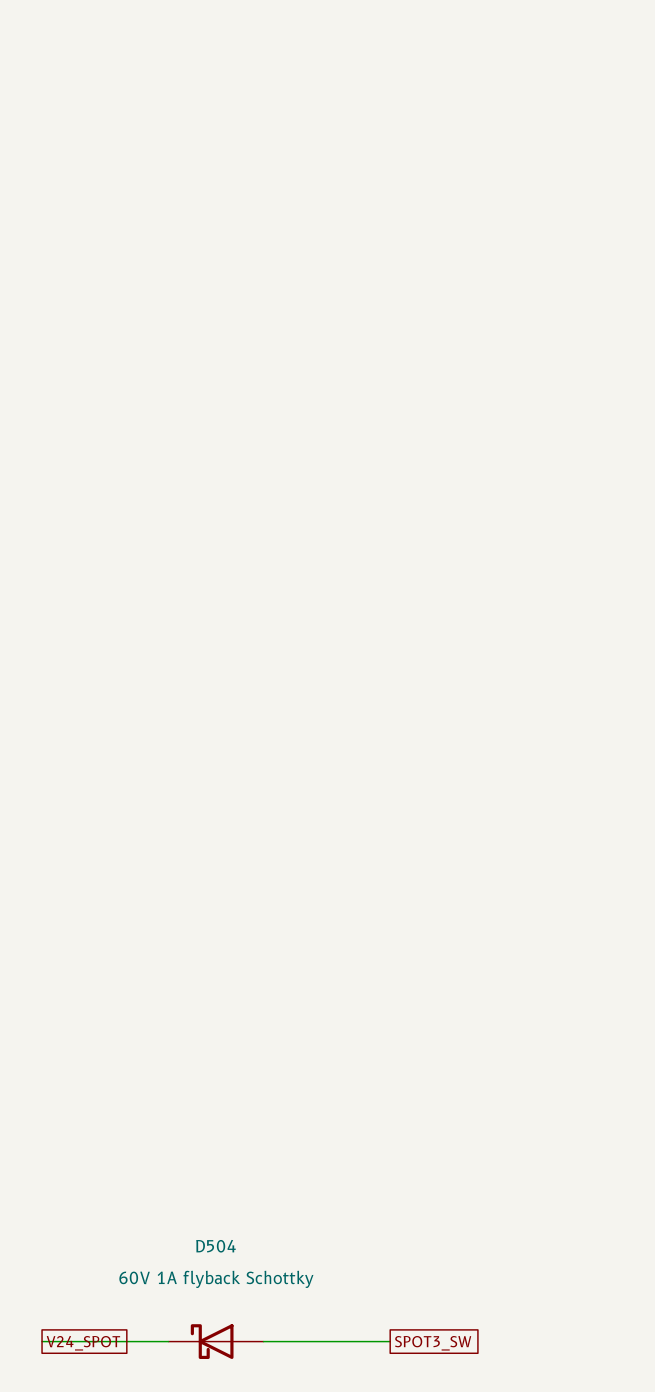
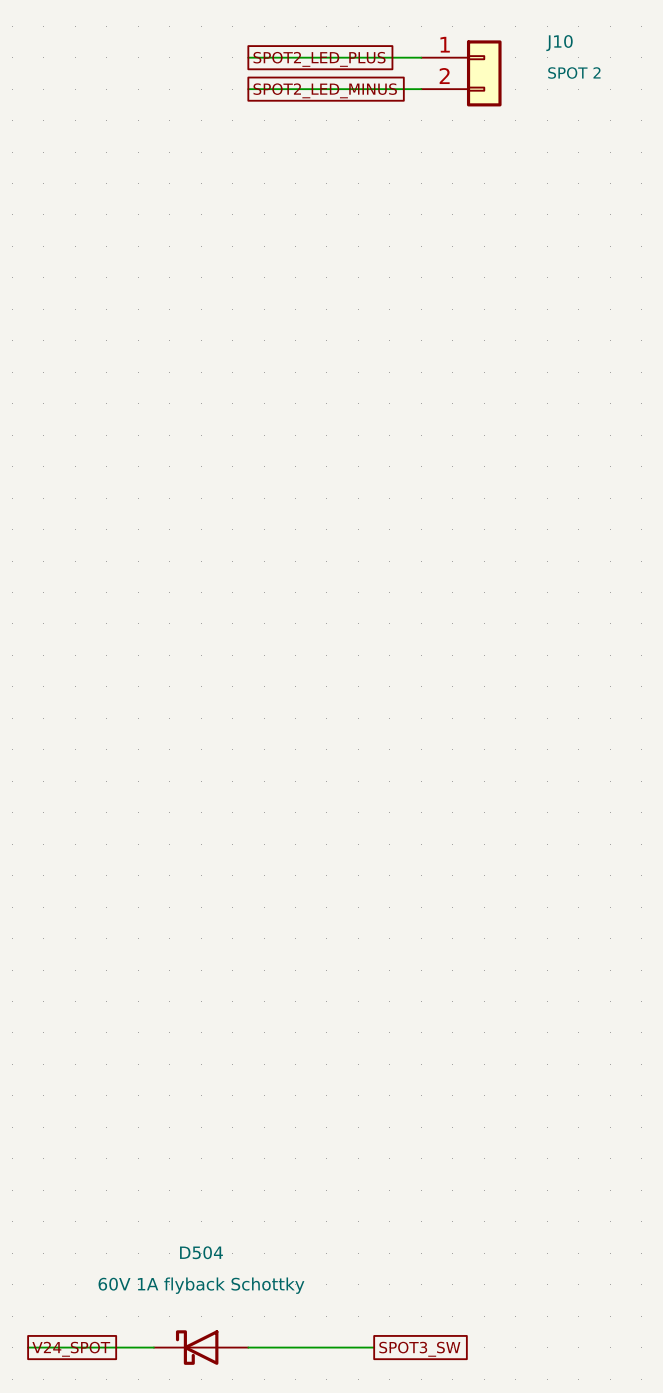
wire: none -> (248, 57) (421, 57)
global label: none -> SPOT2_LED_PLUS (319, 59)
J10: none -> SPOT 2 (461, 73)
wire: none -> (248, 89) (421, 89)
global label: none -> SPOT2_LED_MINUS (325, 90)

